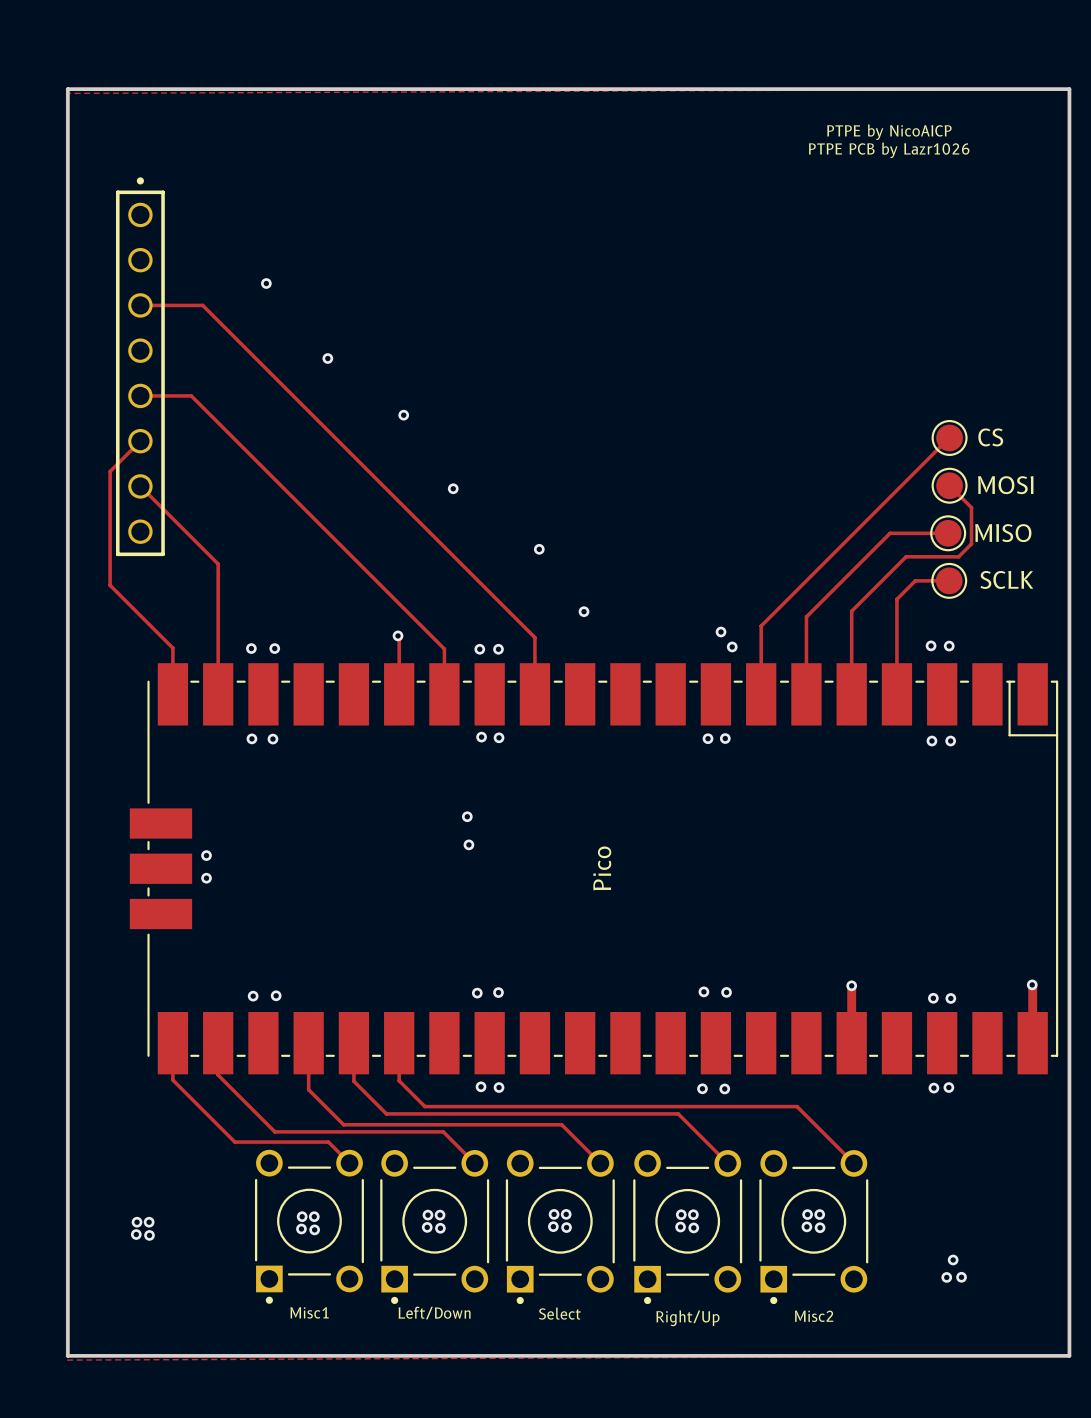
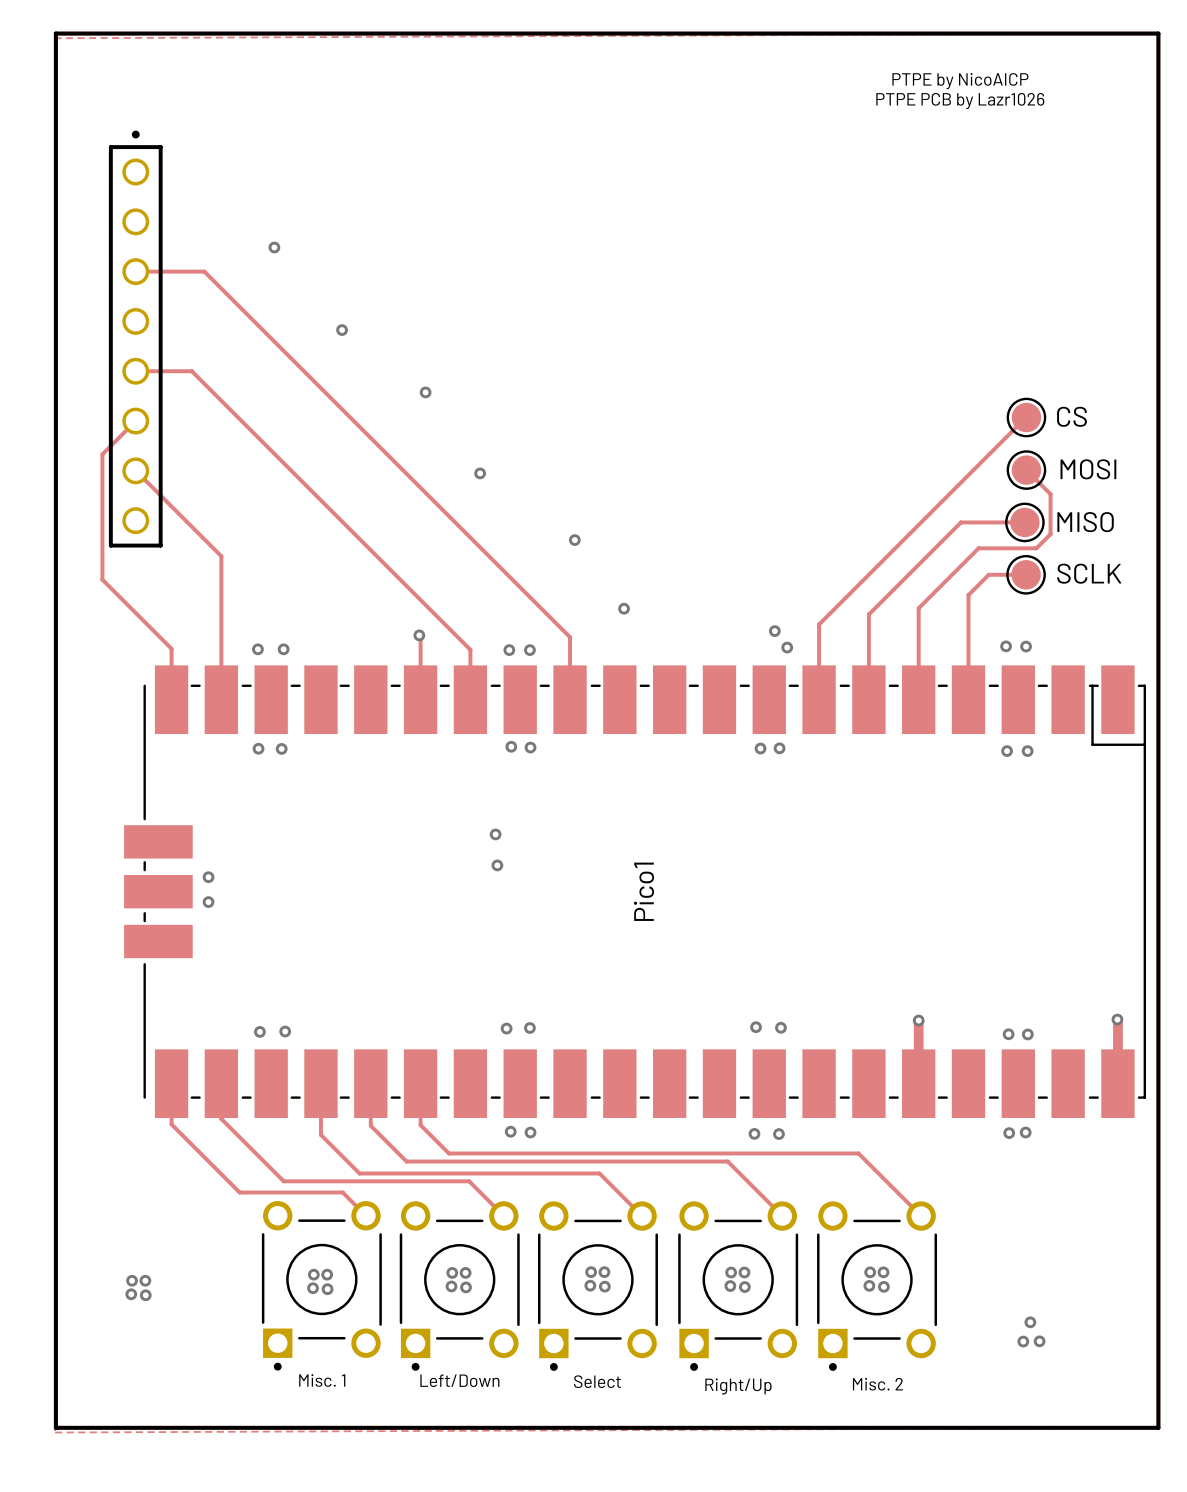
Pico name: Pico (602, 868) -> Pico1 (643, 891)
Misc1 name: Misc1 (309, 1312) -> Misc. 1 (322, 1380)
Misc2 name: Misc2 (814, 1316) -> Misc. 2 (877, 1384)

